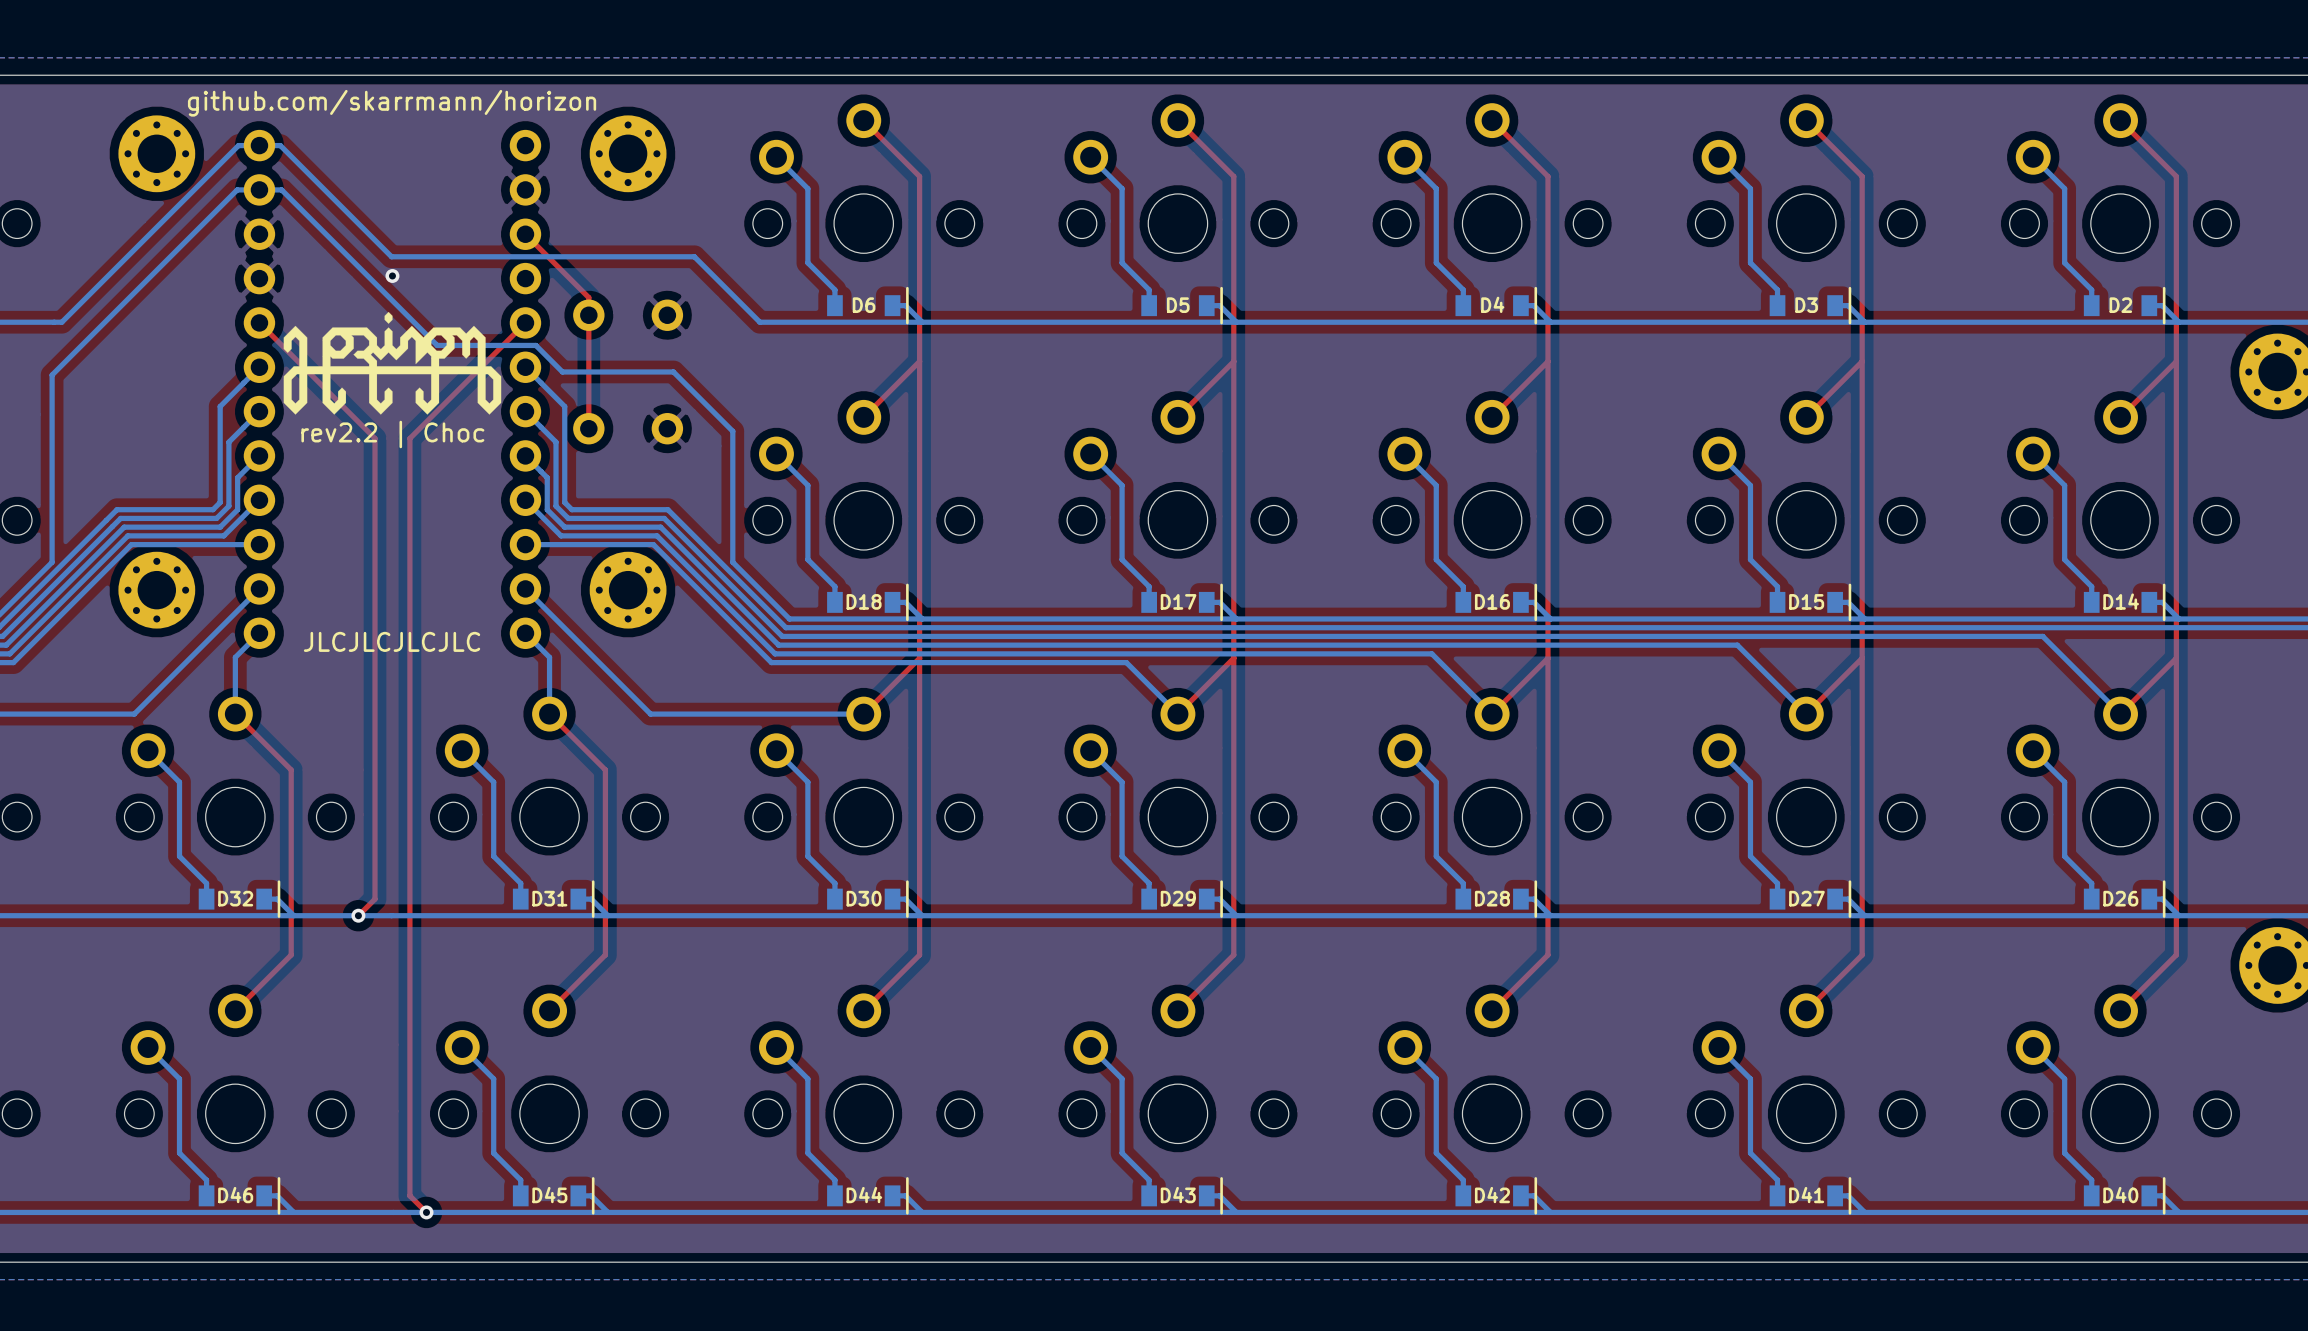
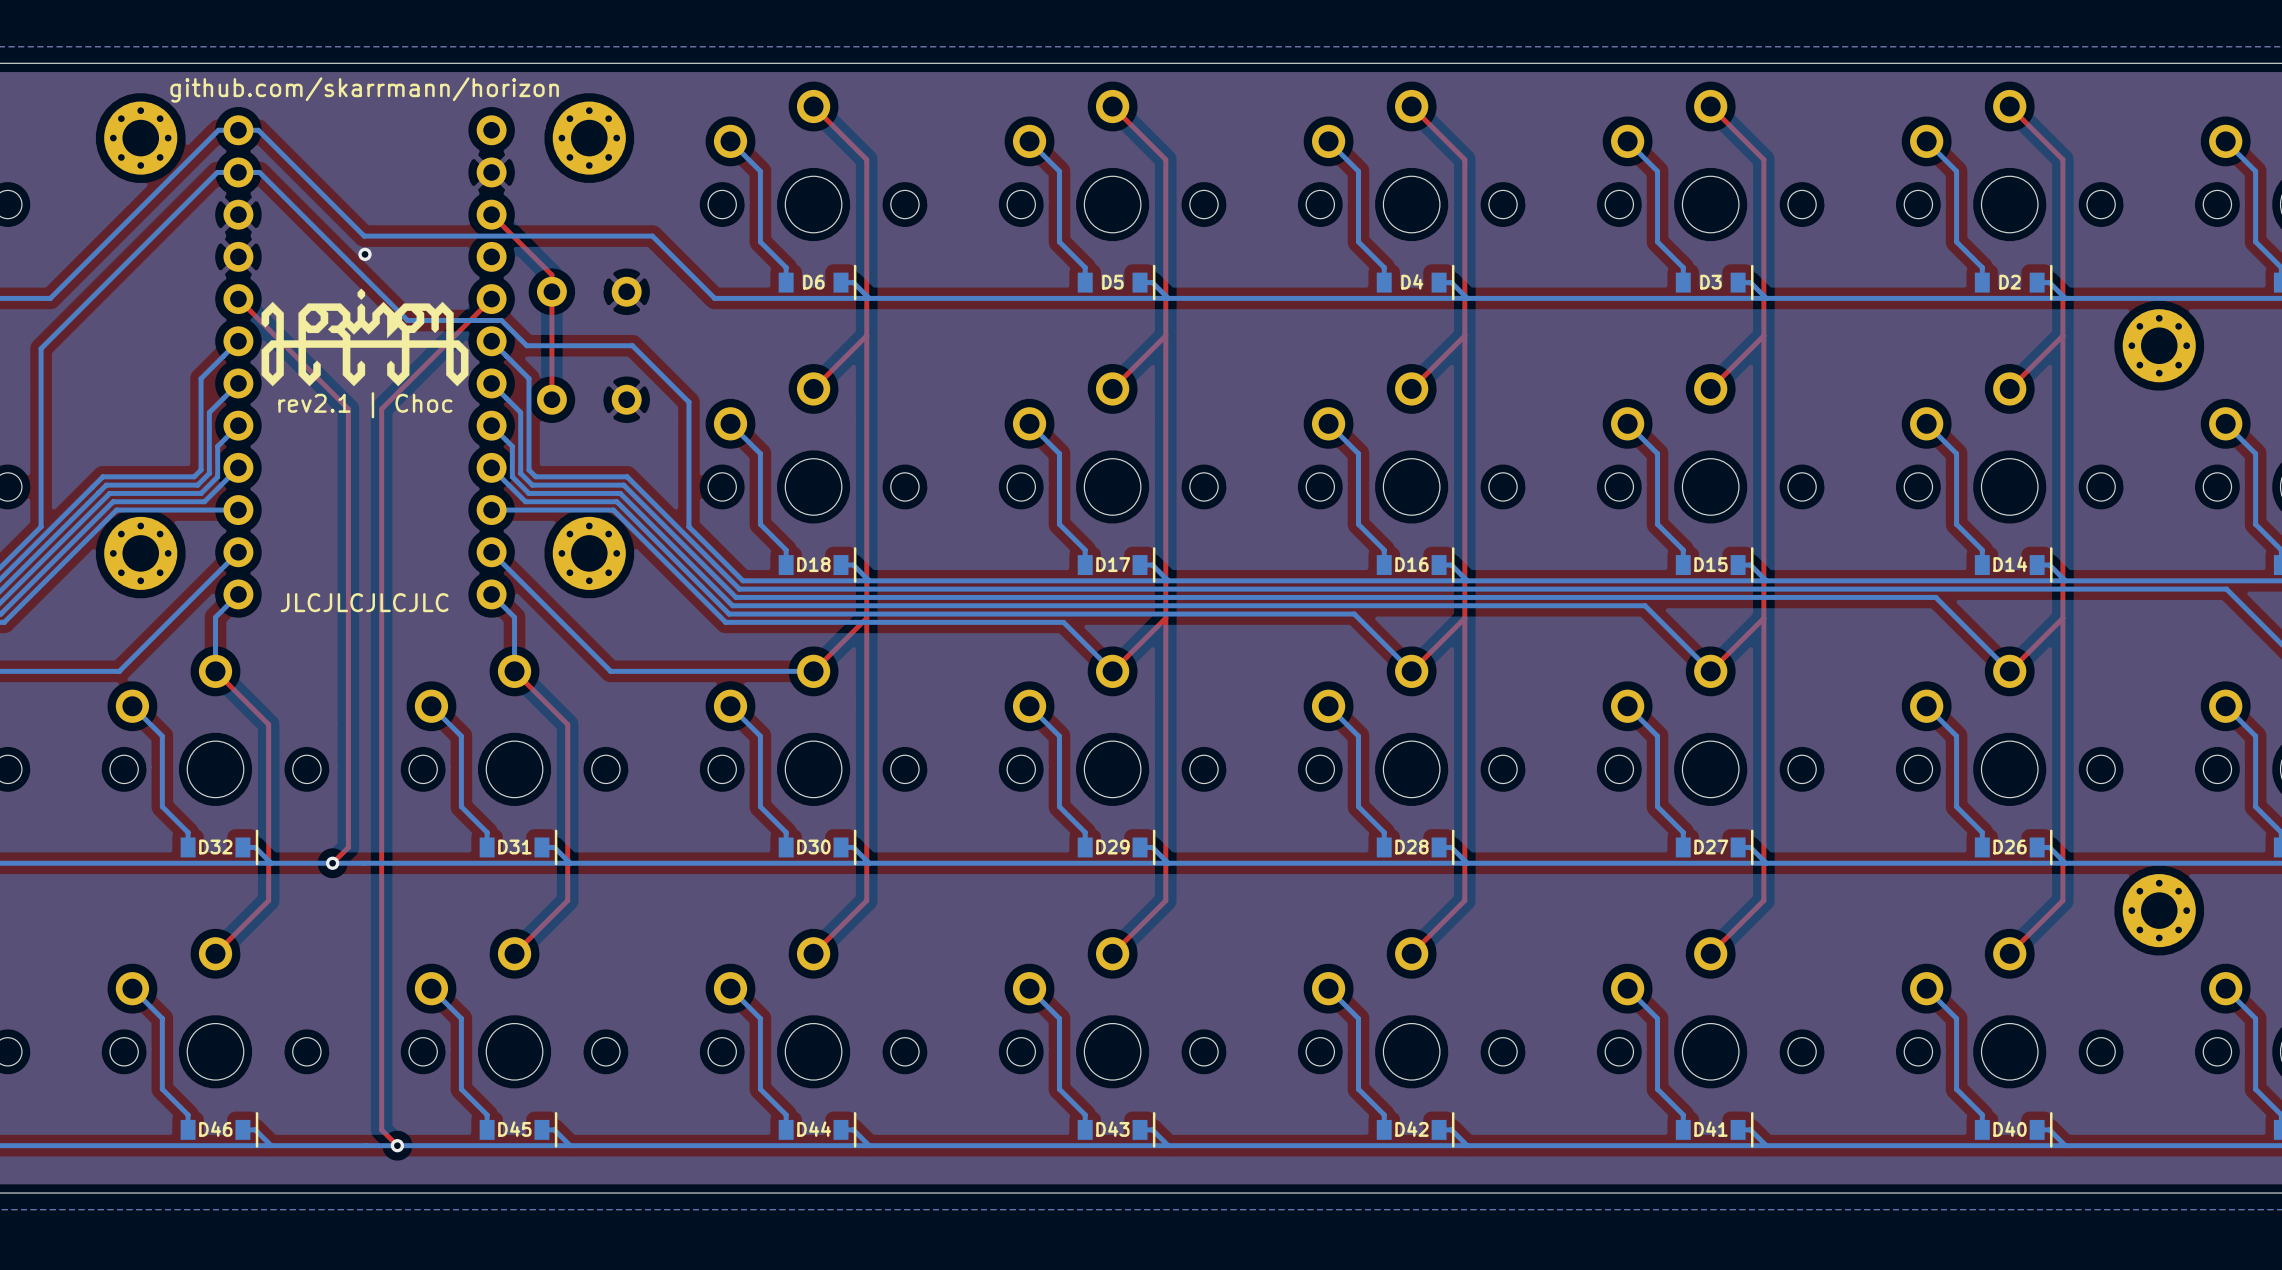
text: rev2.2 | Choc (392, 434) -> rev2.1 | Choc (365, 405)

